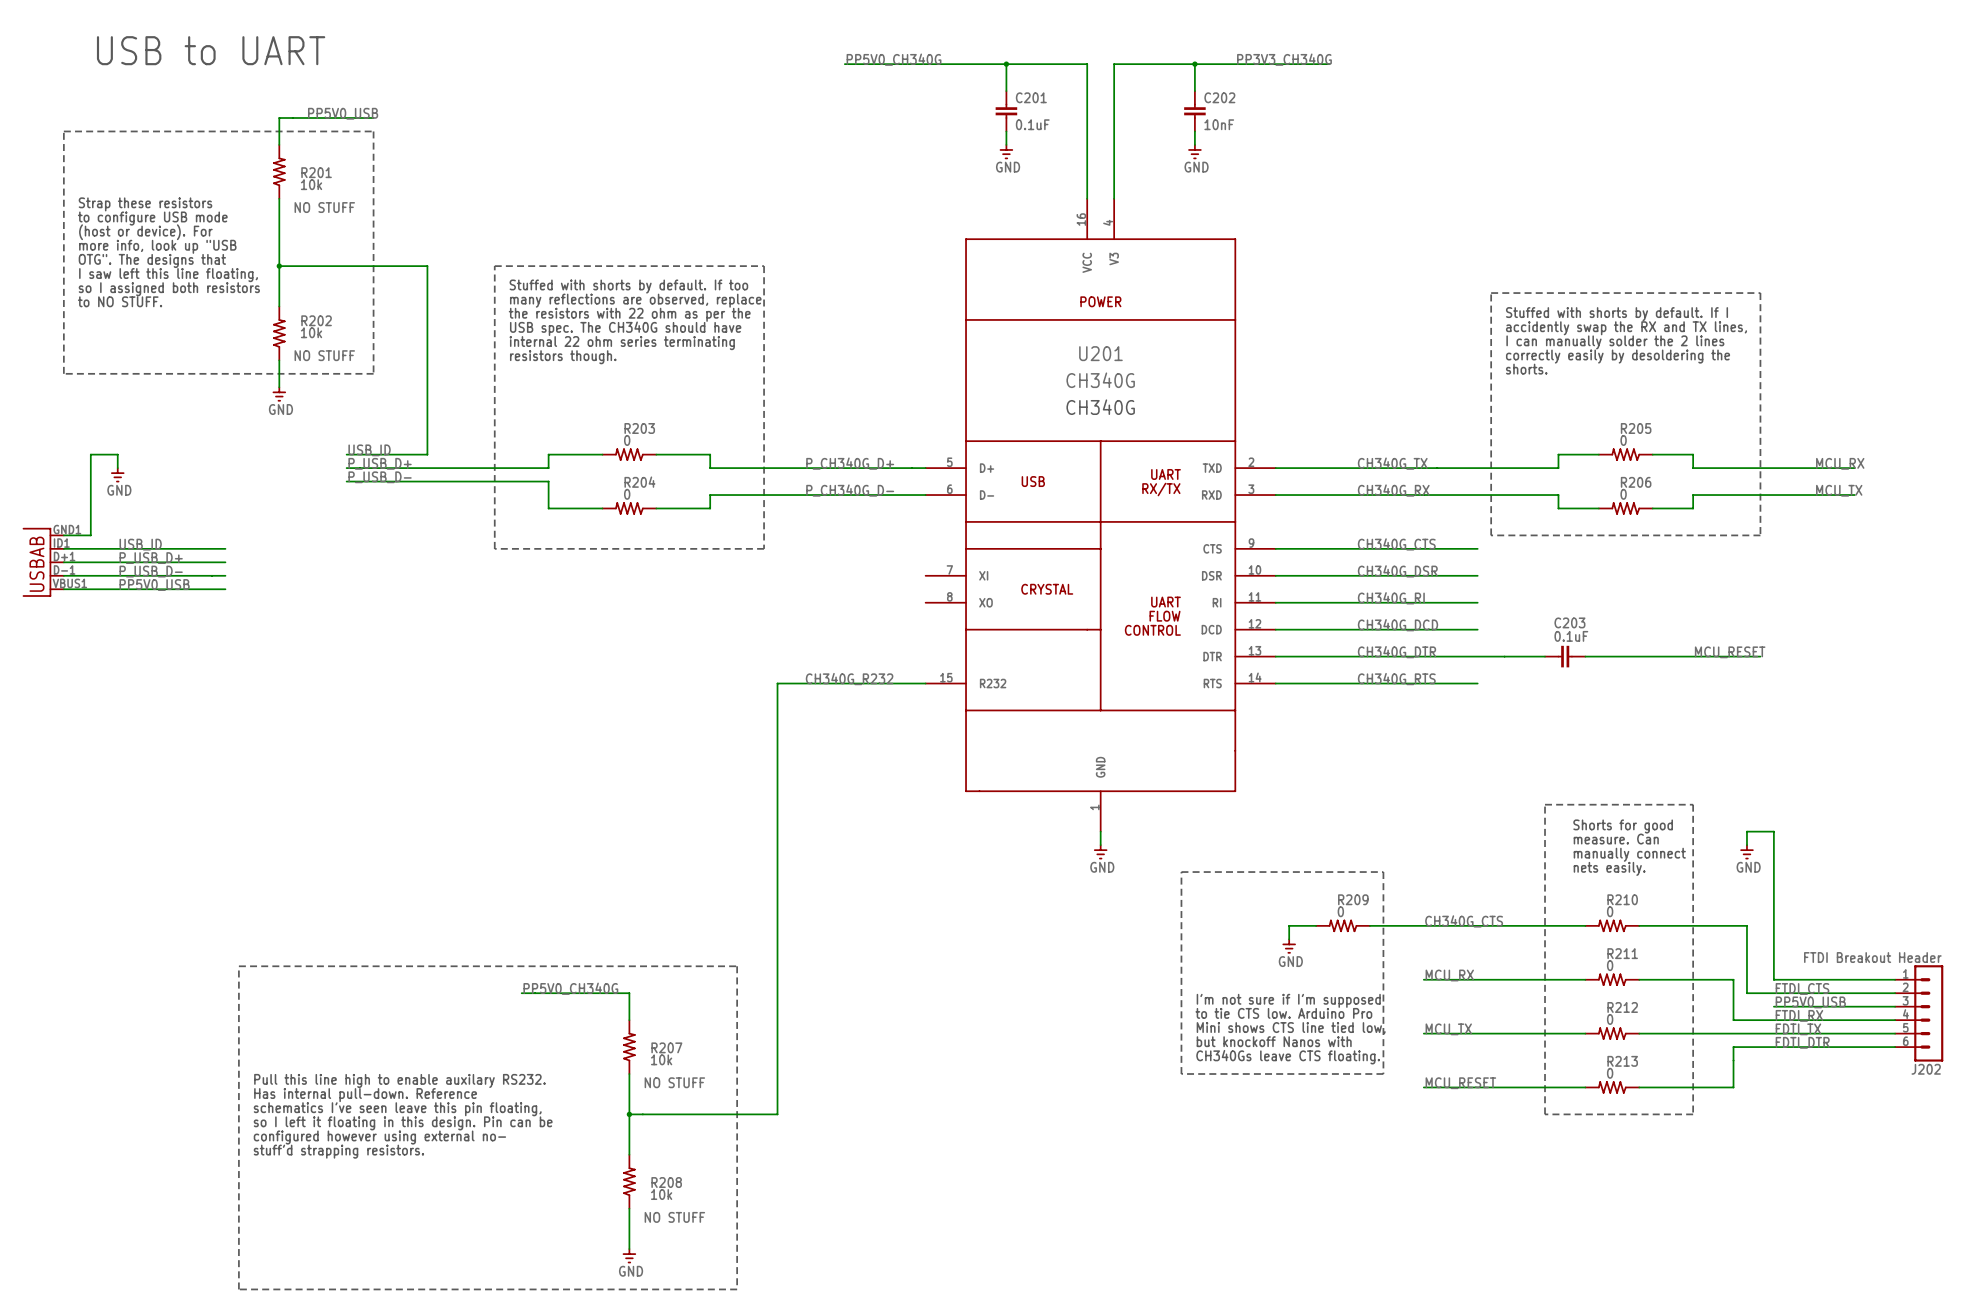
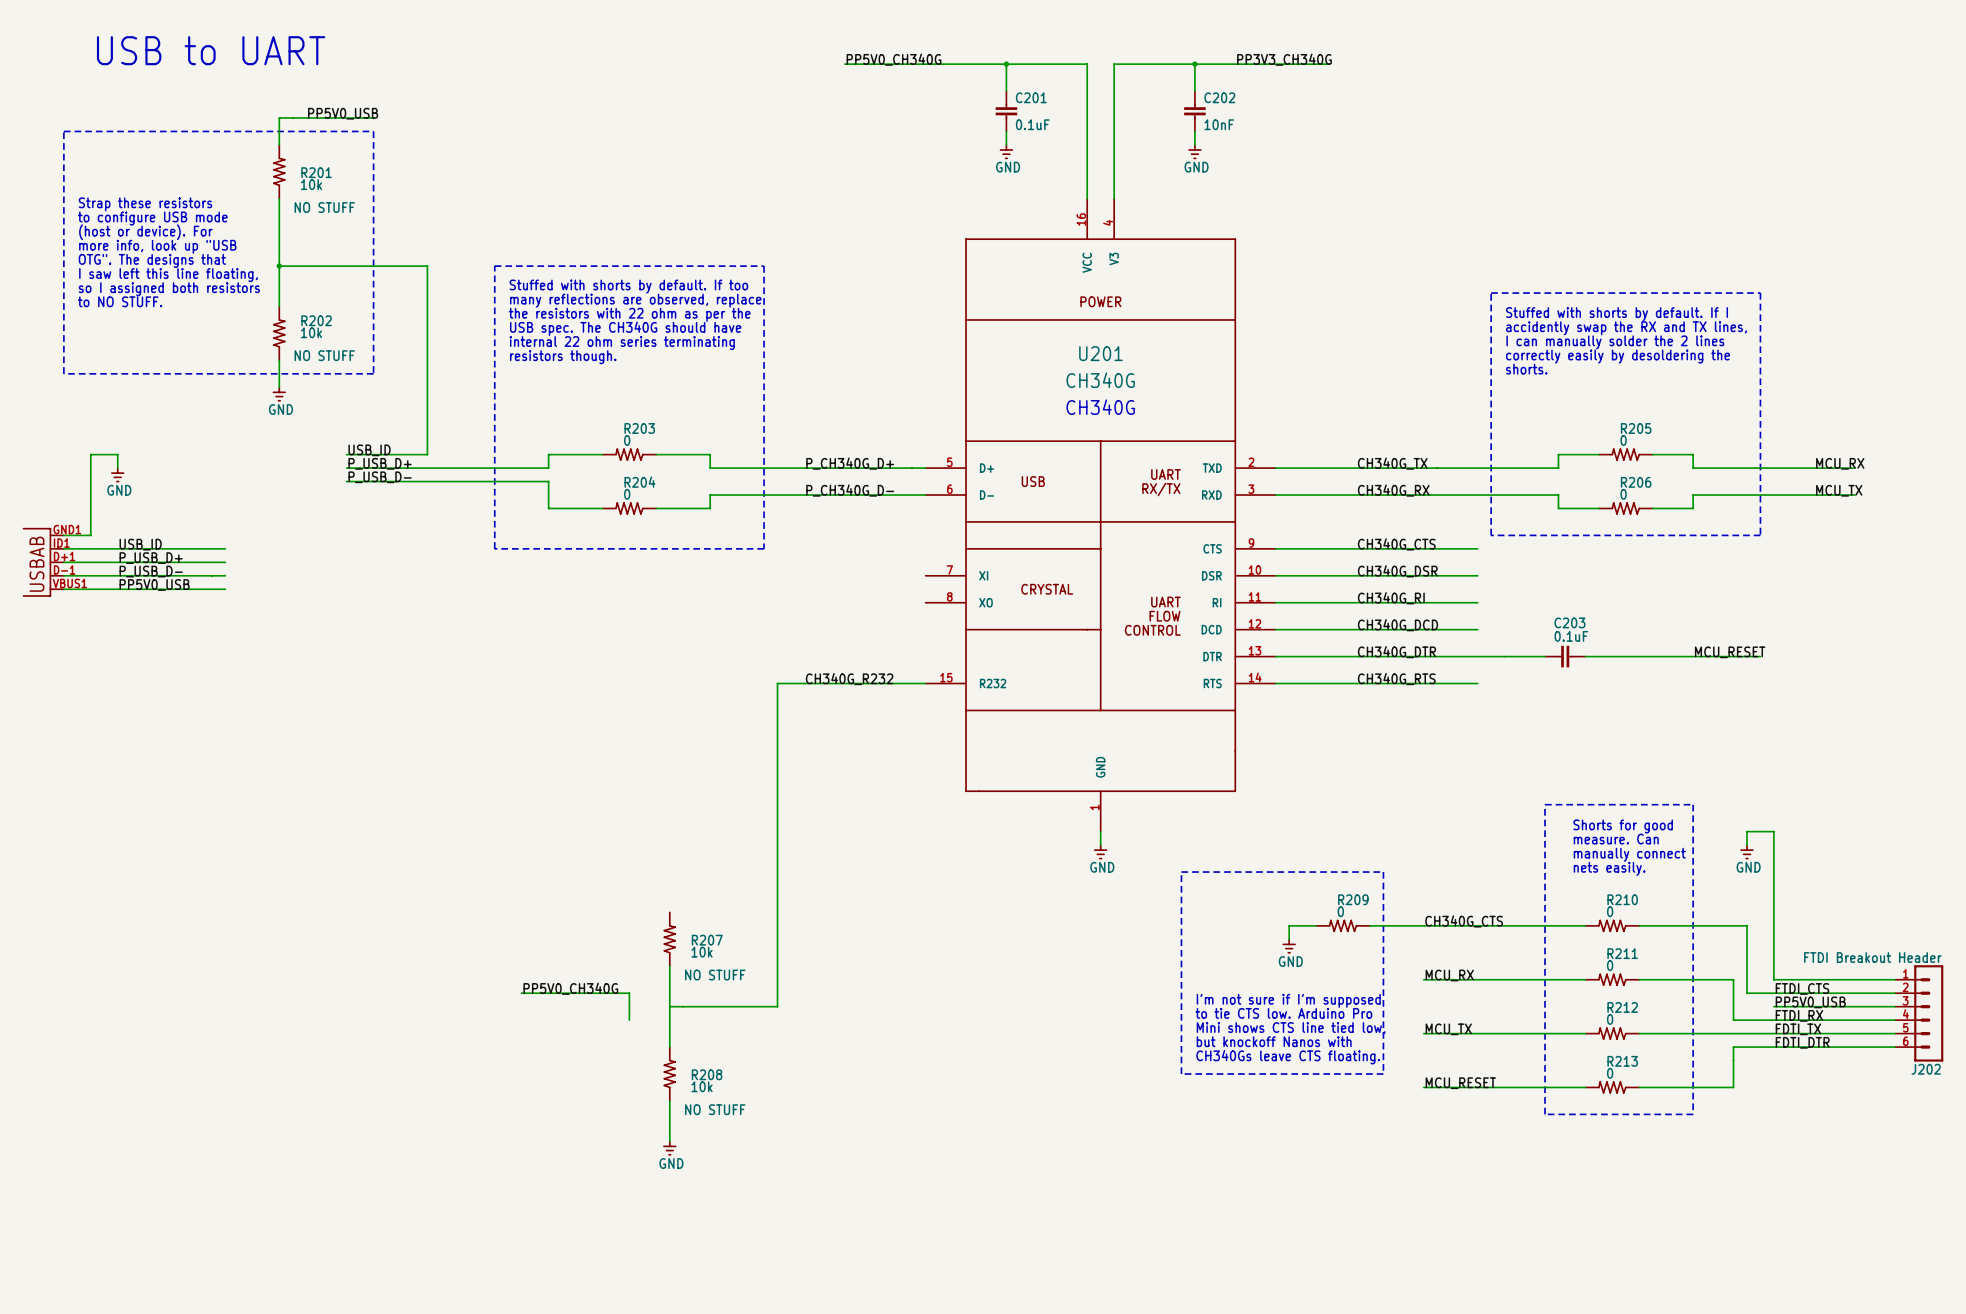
line: (238, 966) (238, 1289) (737, 1289) (737, 966) (238, 966) -> none
wire: (777, 1006) (777, 1114) (629, 1114) -> (777, 1006) (669, 1006)
R207 position: (629, 1047) -> (669, 939)
wire: (629, 1074) (629, 1154) -> (669, 966) (669, 1047)
text: Pull this line high to enable auxilary RS232. (399, 1080) -> none
text: Has internal pull-down. Reference (365, 1095) -> none
text: schematics I've seen leave this pin floating, (397, 1109) -> none
junction: (629, 1114) -> none
text: so I left it floating in this design. Pin can be (403, 1123) -> none
text: configured however using external no- (379, 1137) -> none
text: stuff'd strapping resistors. (338, 1151) -> none
R208 position: (629, 1181) -> (669, 1074)
wire: (629, 1208) (629, 1249) -> (669, 1100) (669, 1141)
power symbol position: GND (629, 1255) -> GND (669, 1148)

